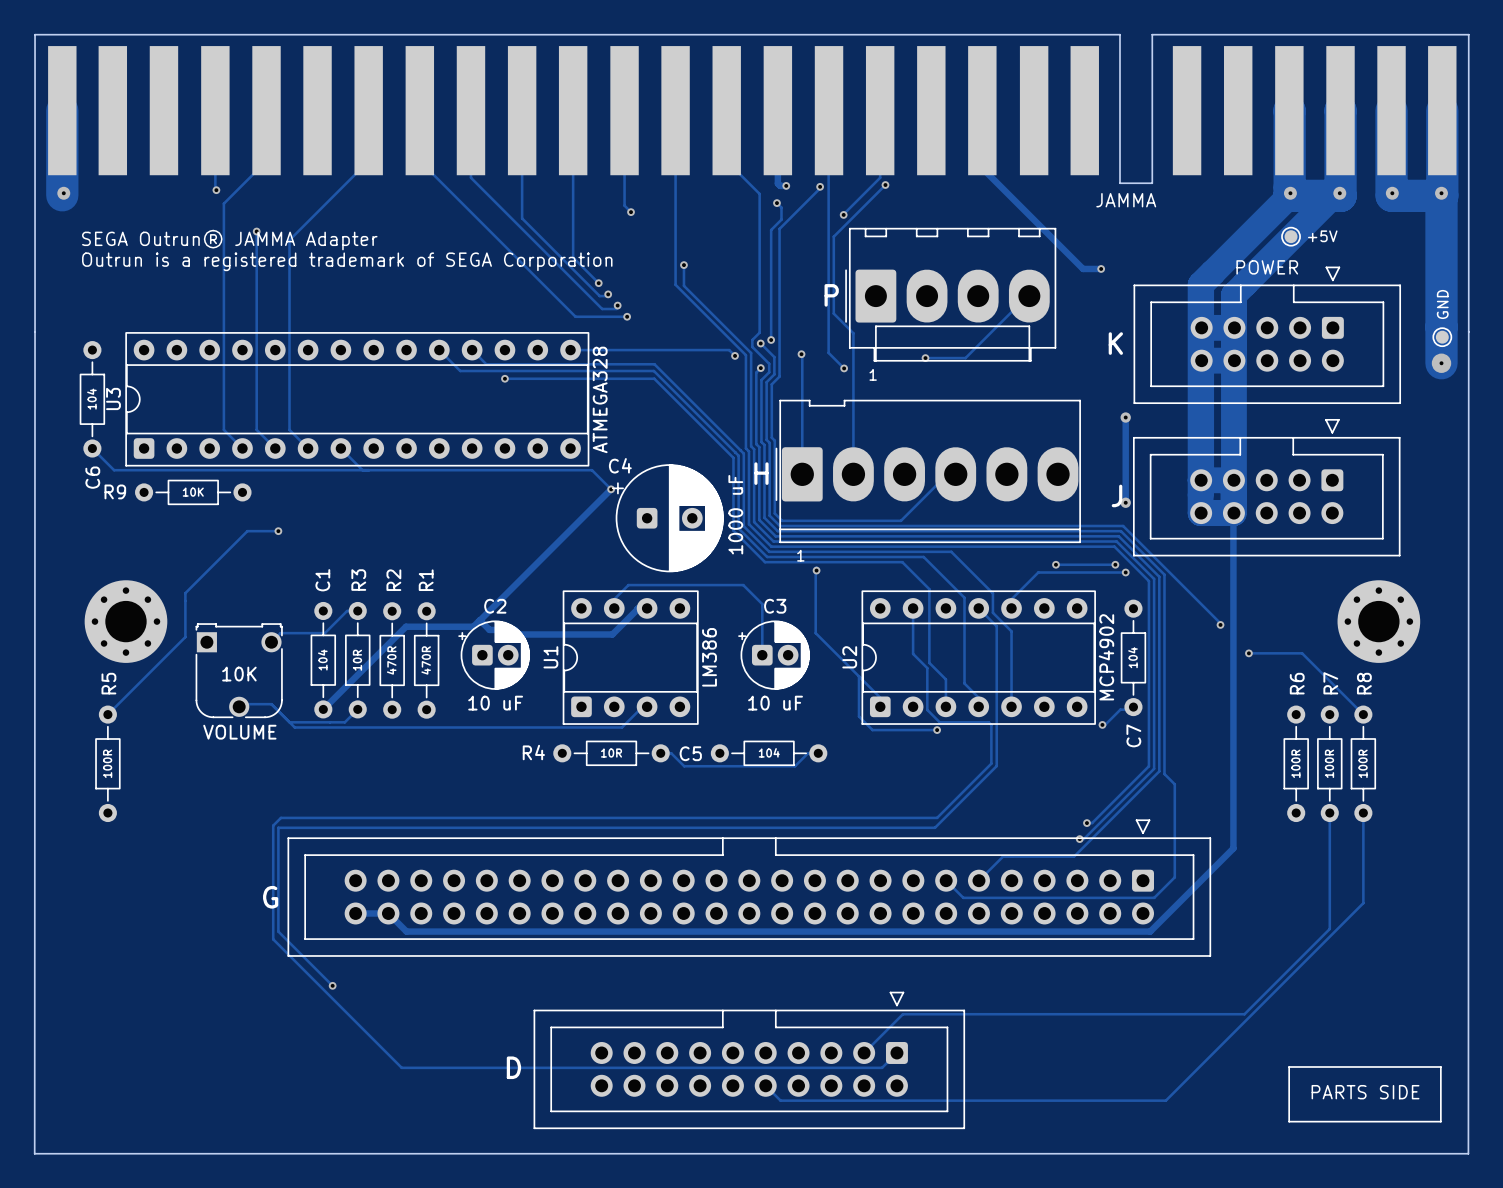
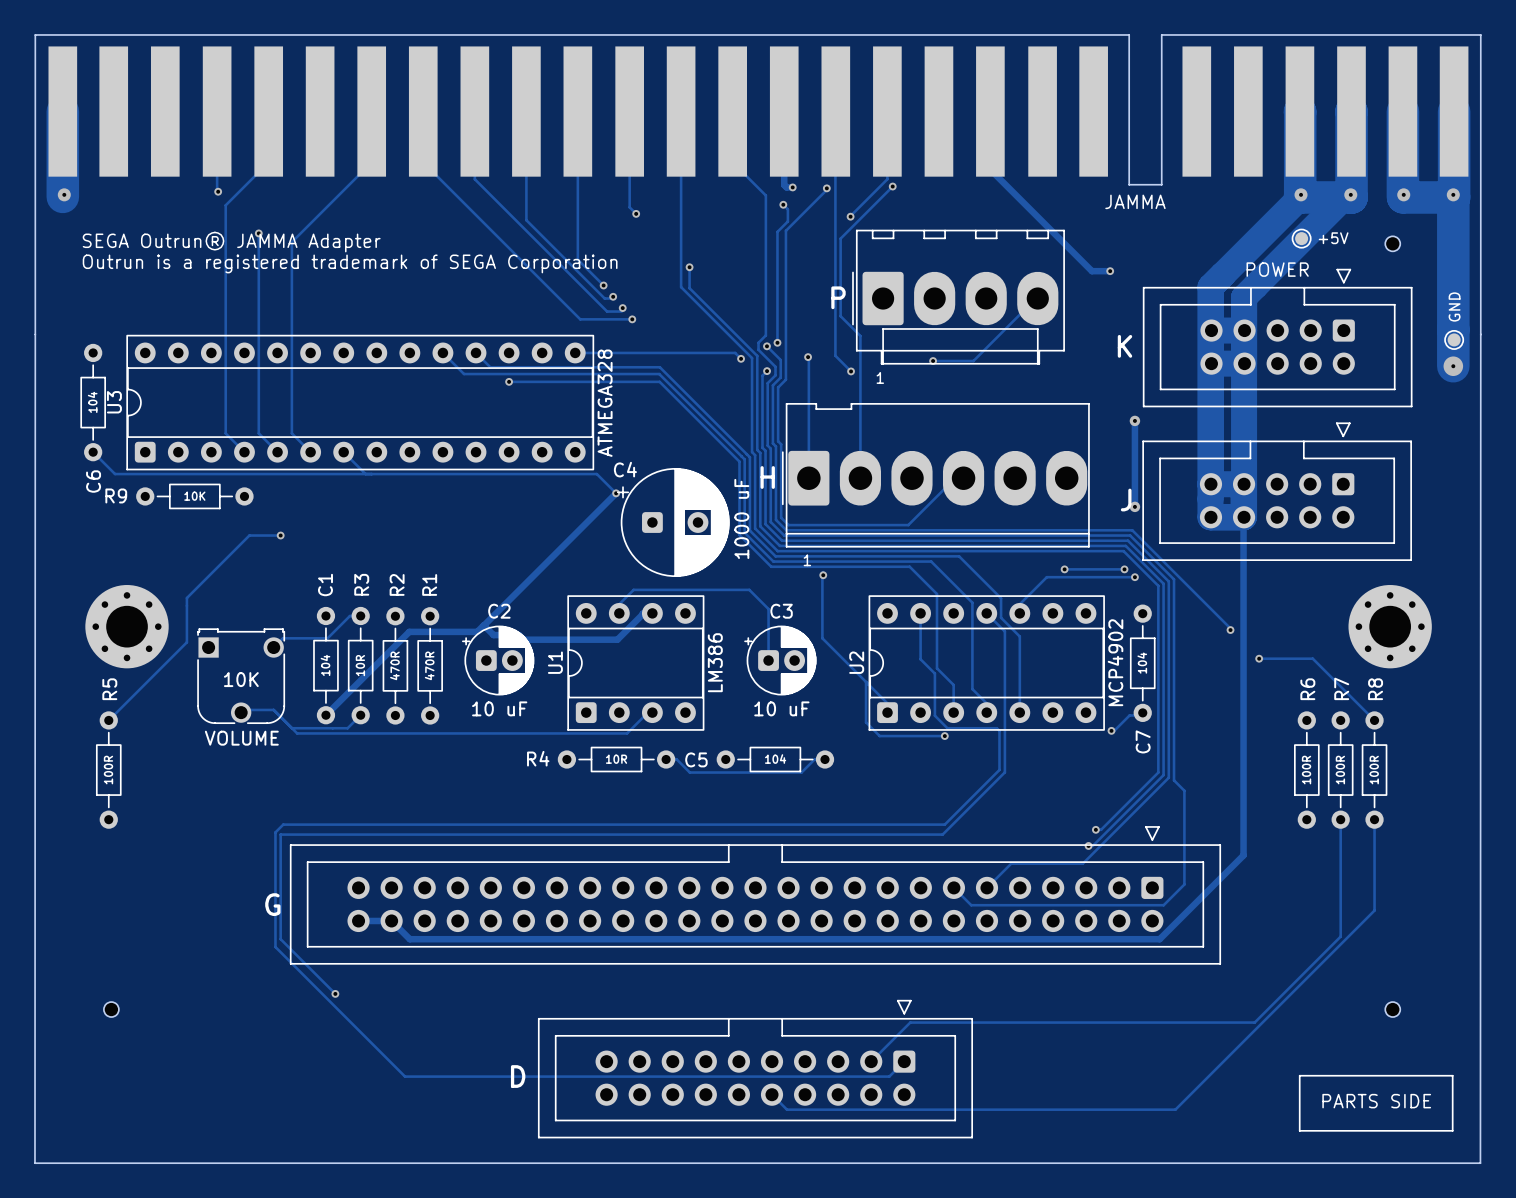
part: none -> (1392, 243)
part: none -> (111, 1009)
part: none -> (1392, 1009)

